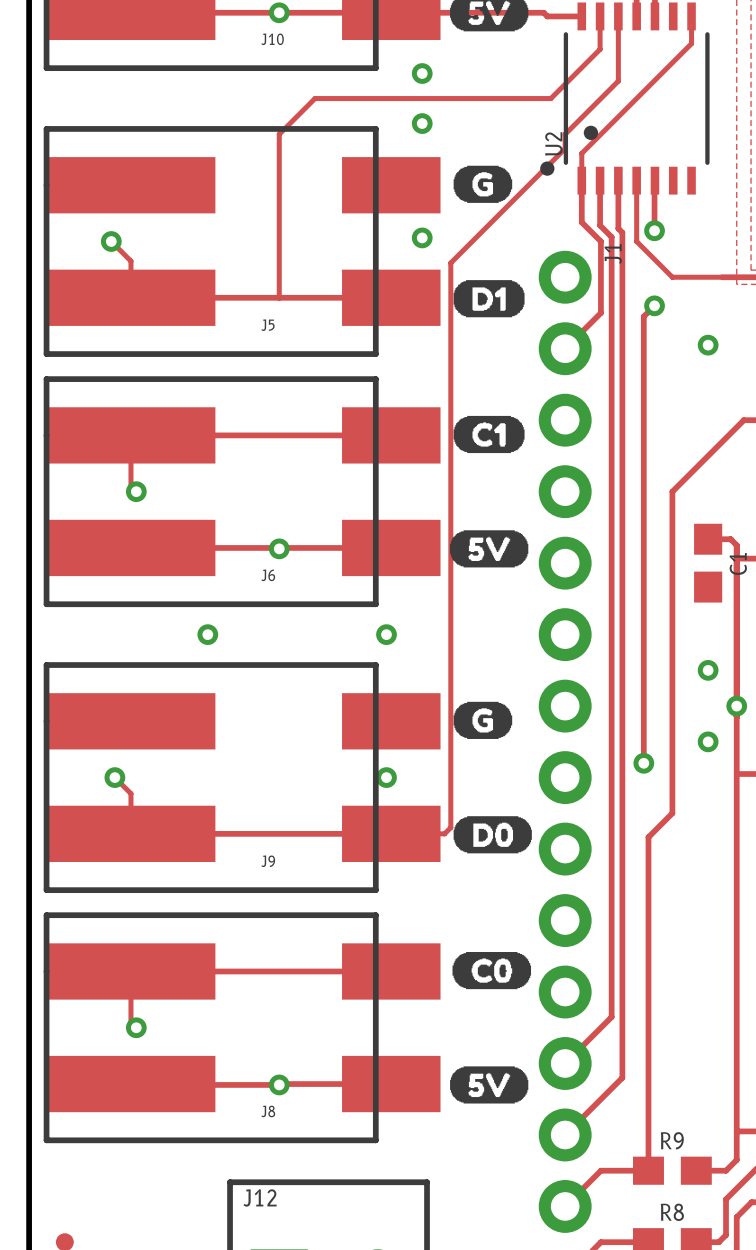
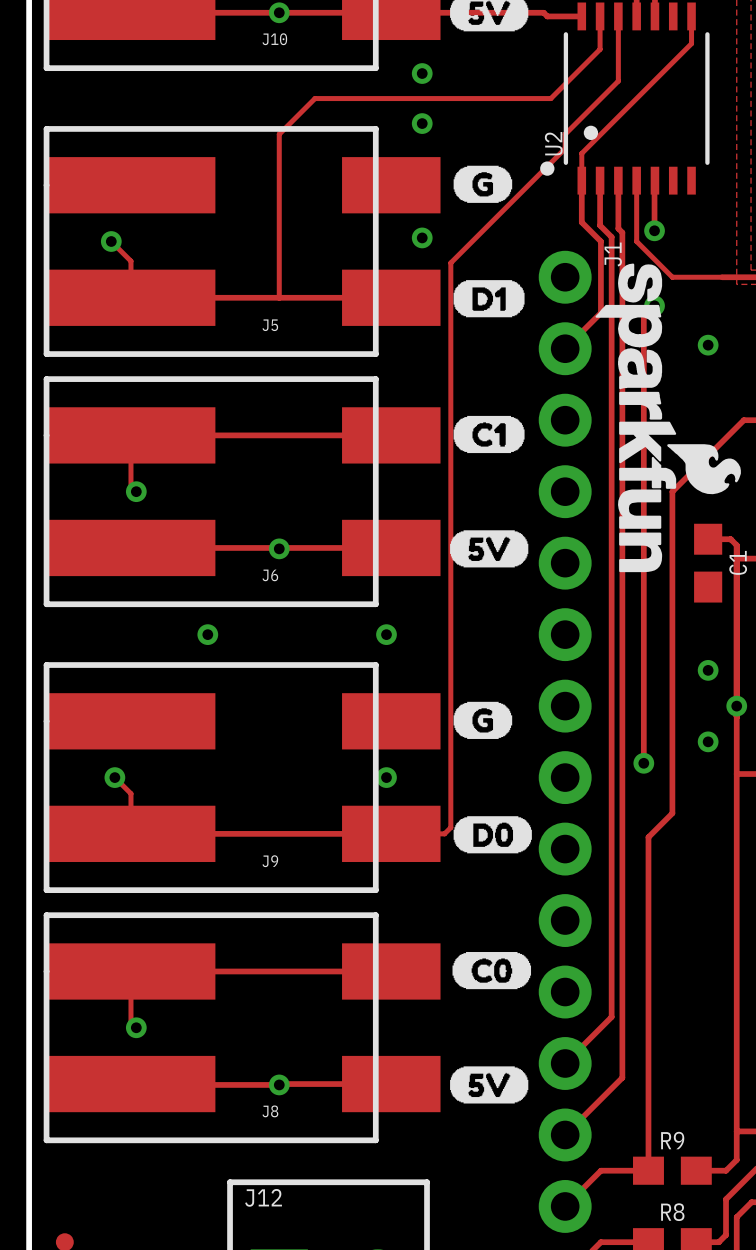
drawing: none -> [595, 263, 741, 573]

